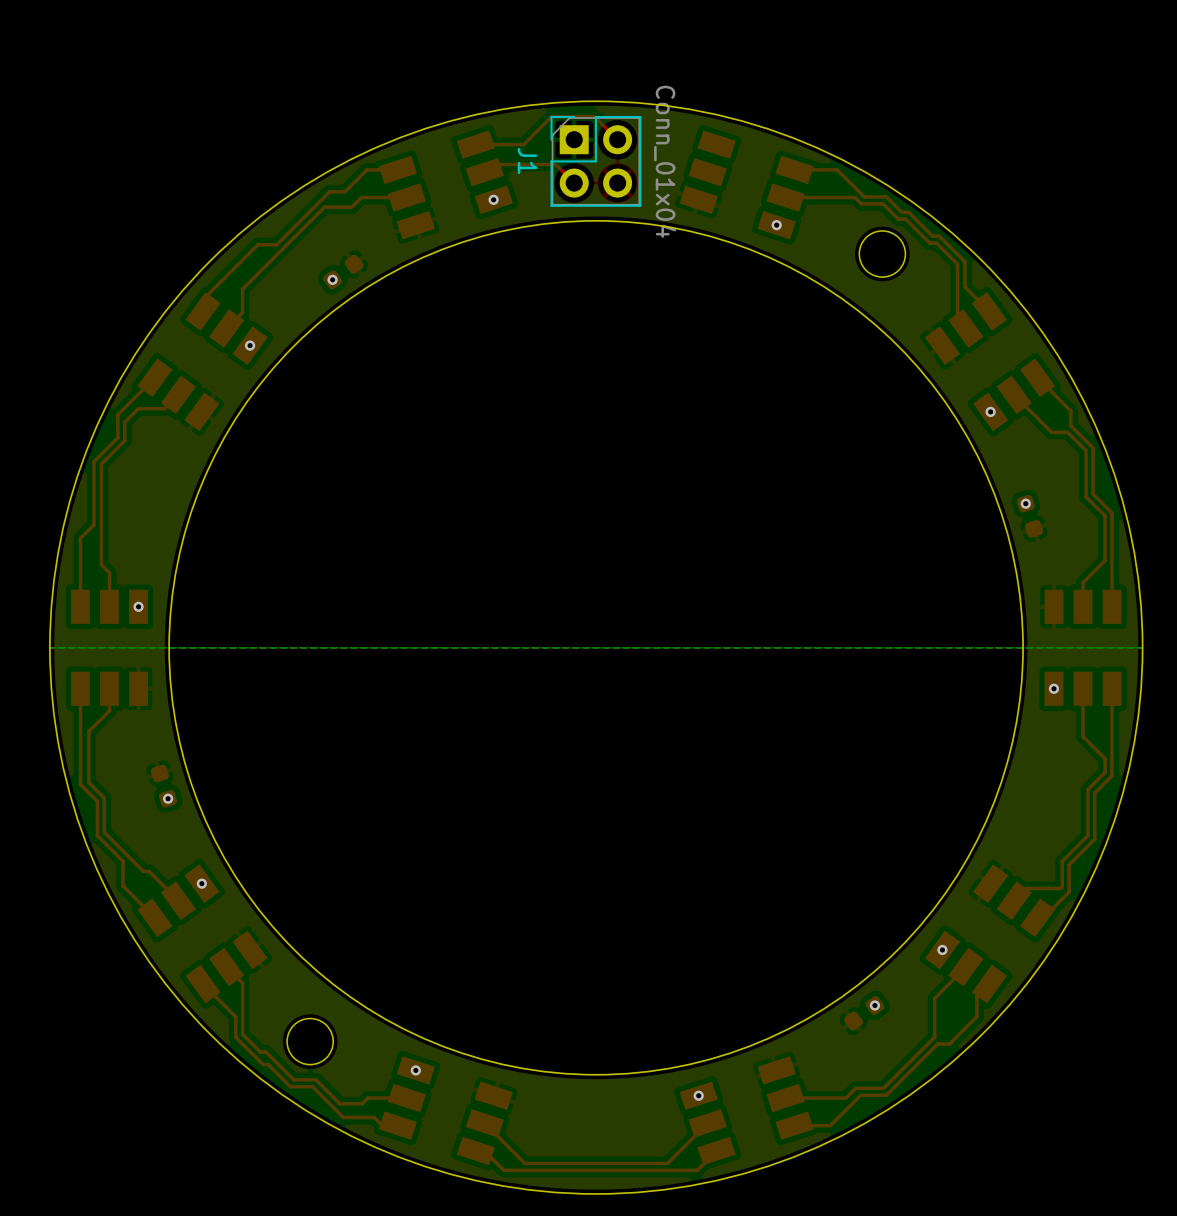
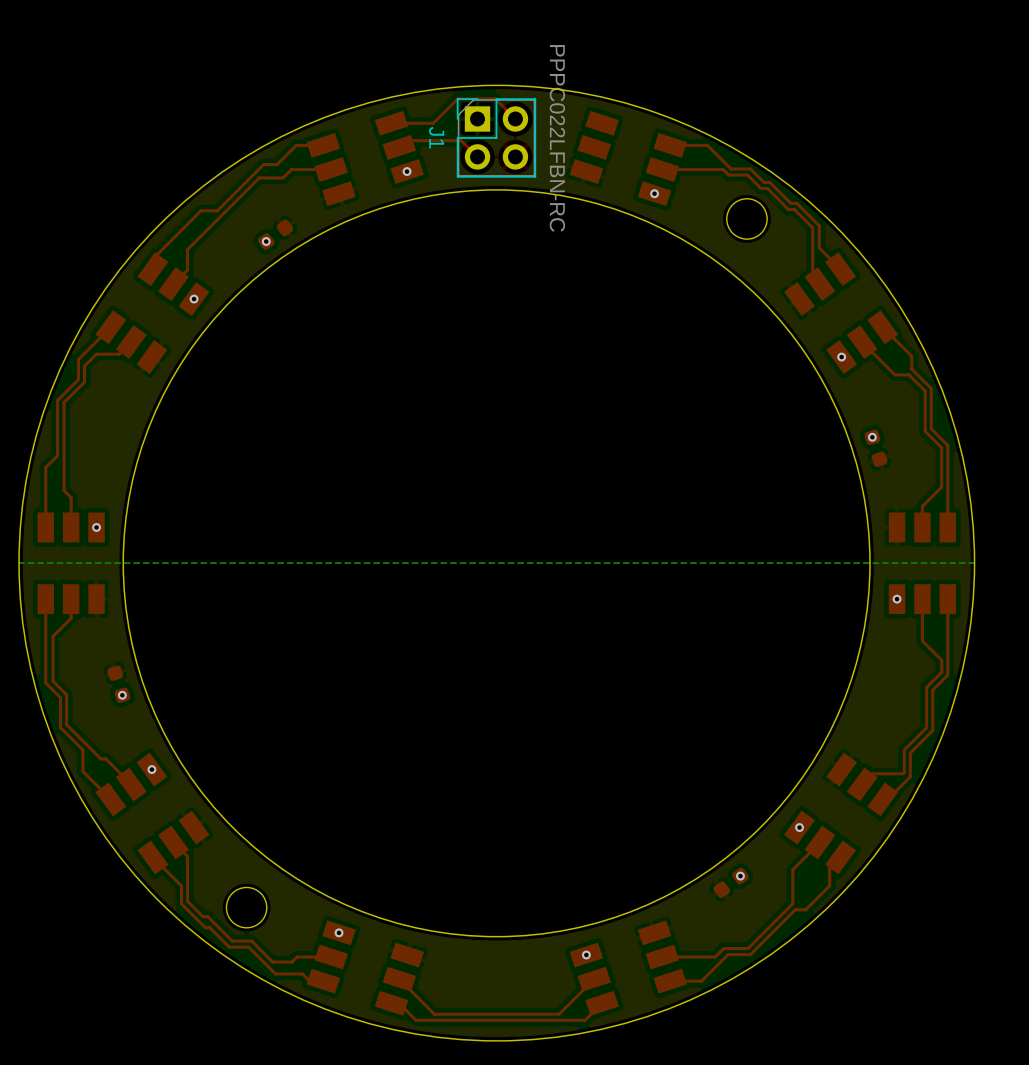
J1 value: Conn_01x04 (665, 161) -> PPPC022LFBN-RC (557, 138)

